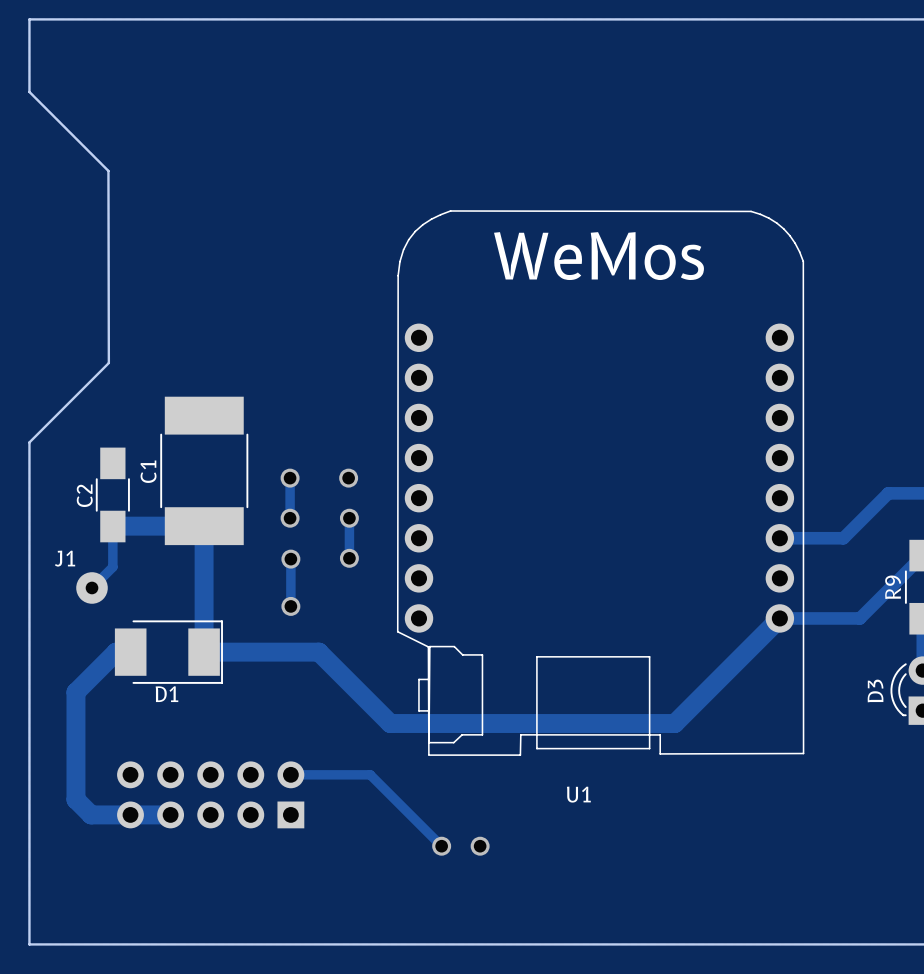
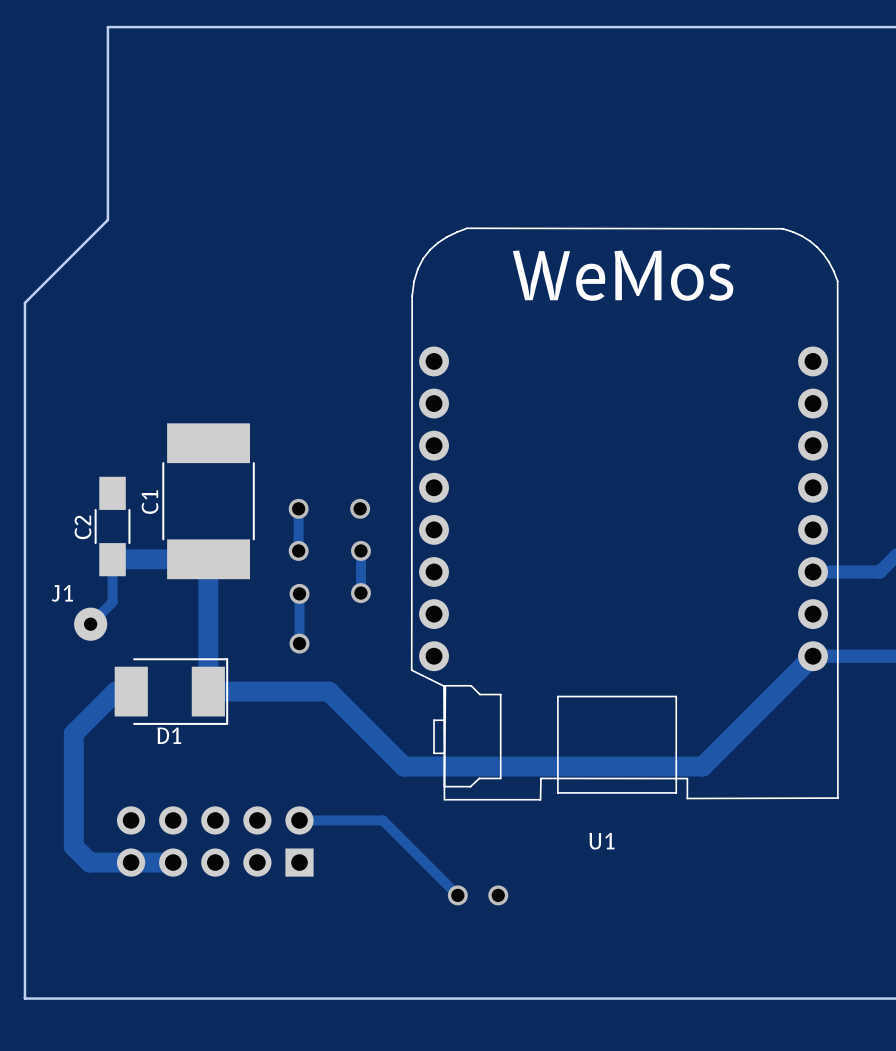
board edge: (108, 19) (29, 19) (29, 91) (108, 170) (108, 362) -> (107, 27) (107, 219) (24, 302) (24, 471)
board edge: (108, 363) (29, 442) -> none

